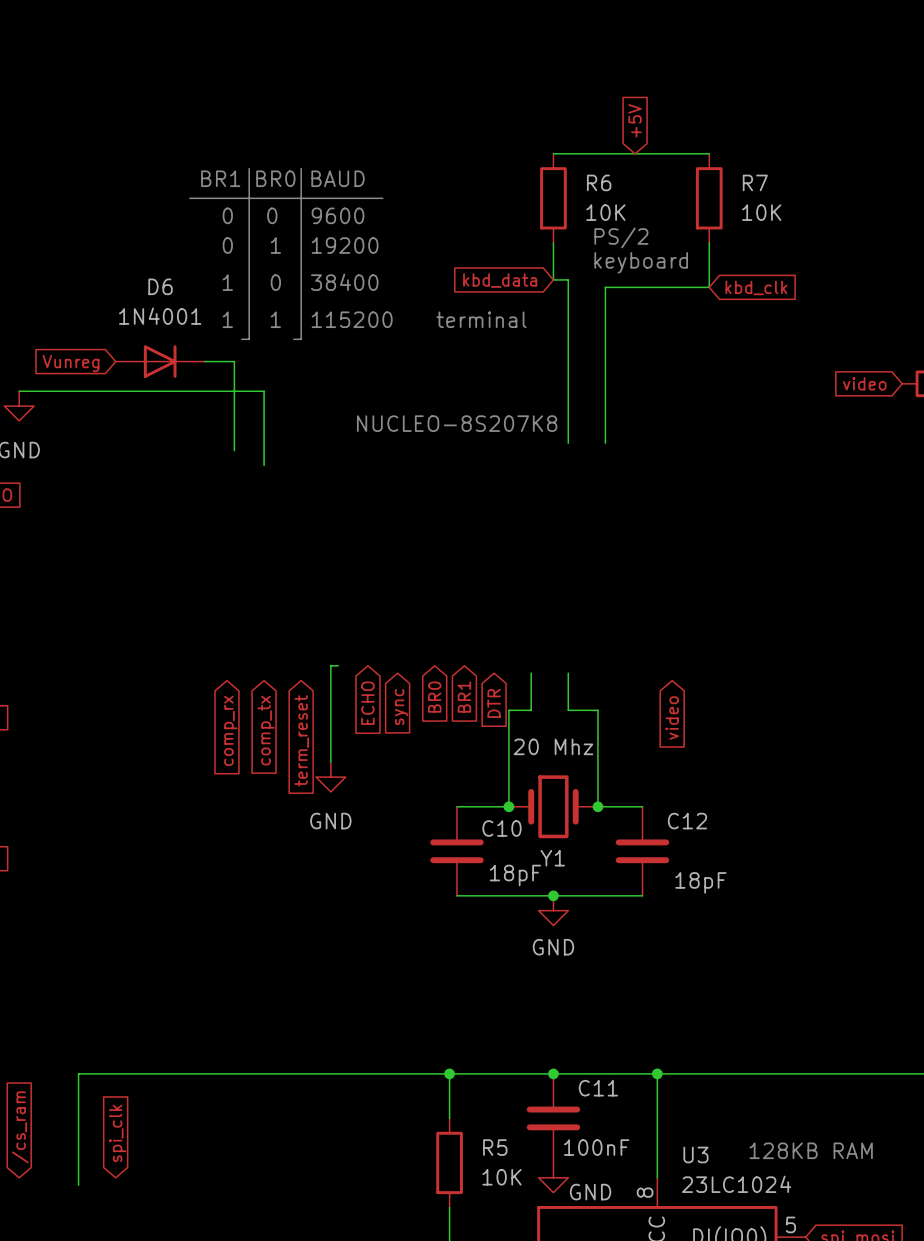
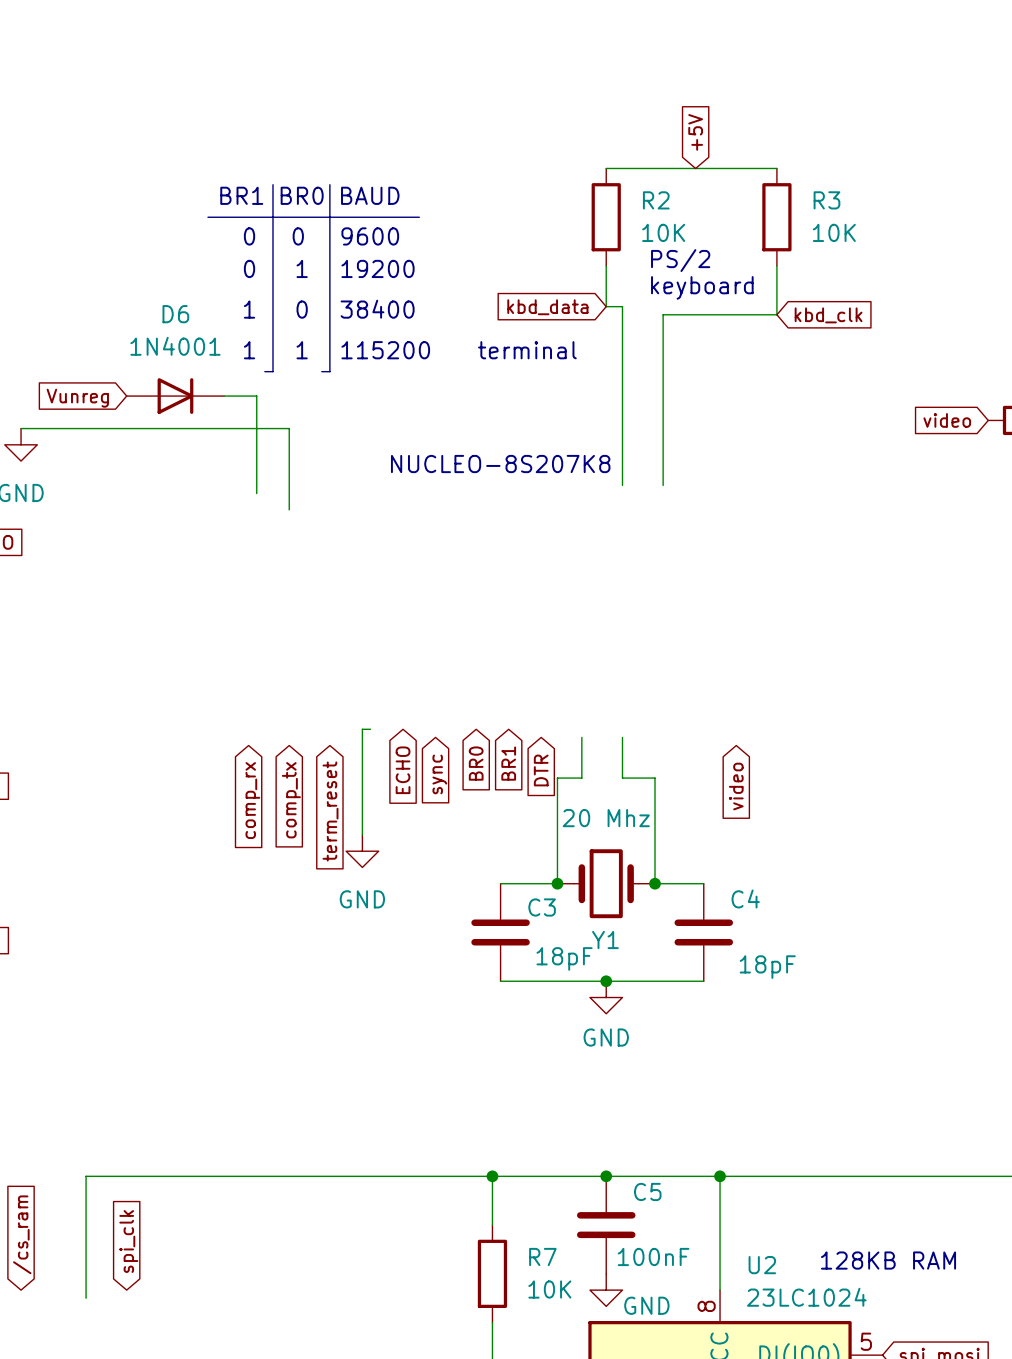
R6 name: R6 (599, 182) -> R2 (656, 200)
R7 name: R7 (755, 182) -> R3 (826, 200)
C12 name: C12 (687, 821) -> C4 (745, 898)
C10 name: C10 (501, 828) -> C3 (542, 907)
C11 name: C11 (598, 1088) -> C5 (647, 1191)
R5 name: R5 (495, 1147) -> R7 (542, 1256)
U3 name: U3 (695, 1154) -> U2 (762, 1265)

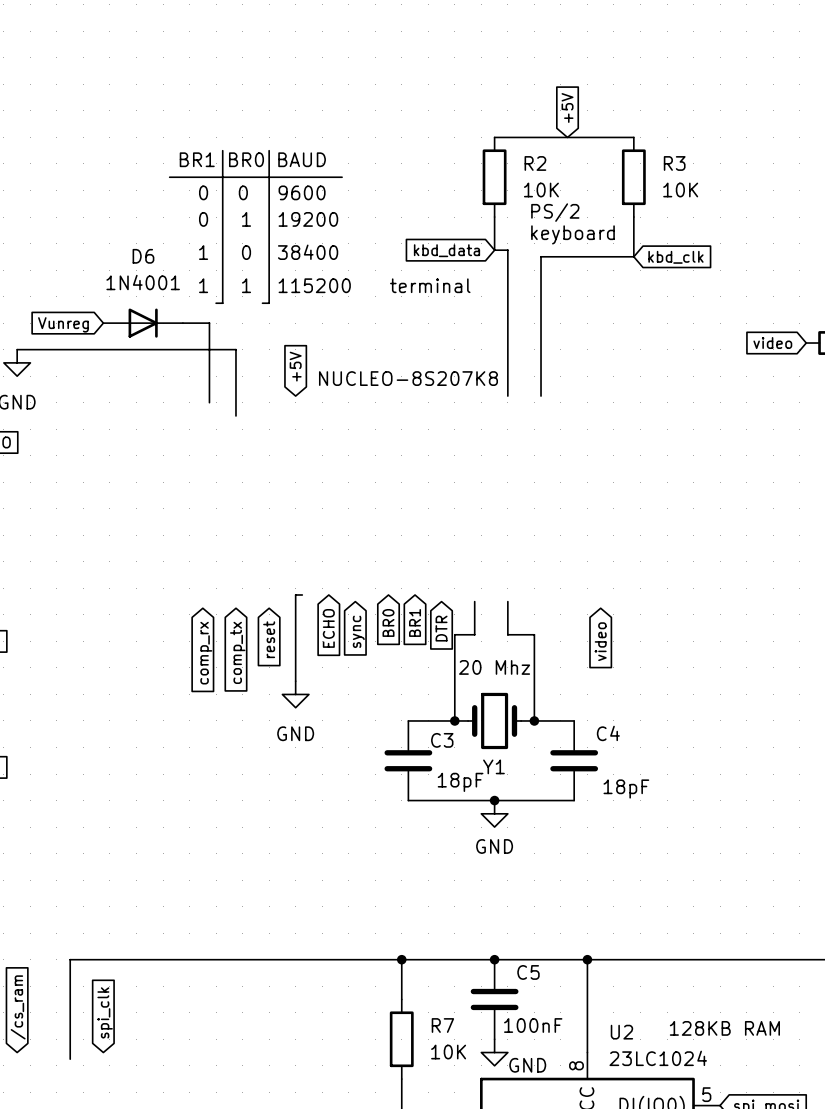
global label: none -> +5V (295, 366)
global label: term_reset (330, 811) -> reset (269, 639)

